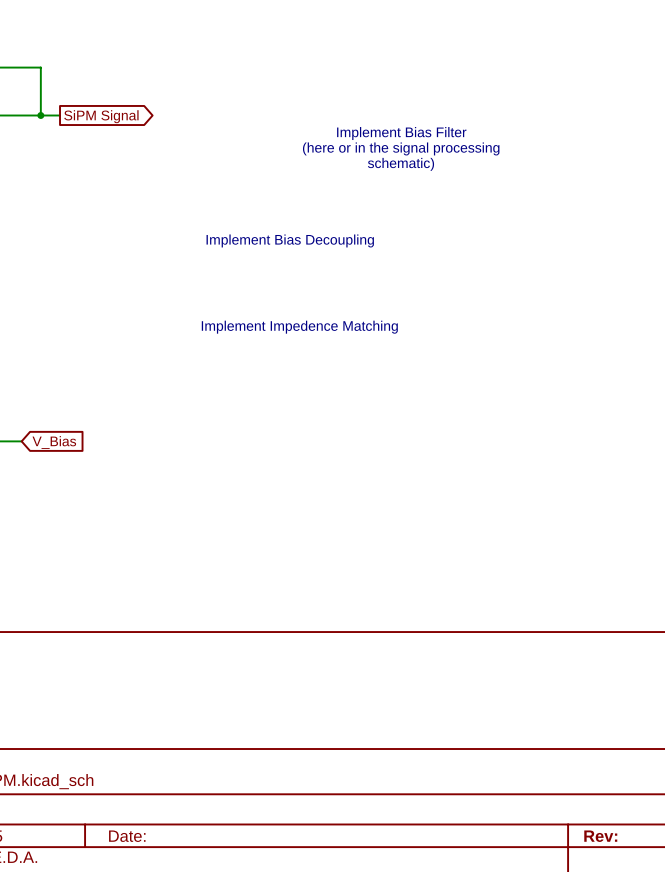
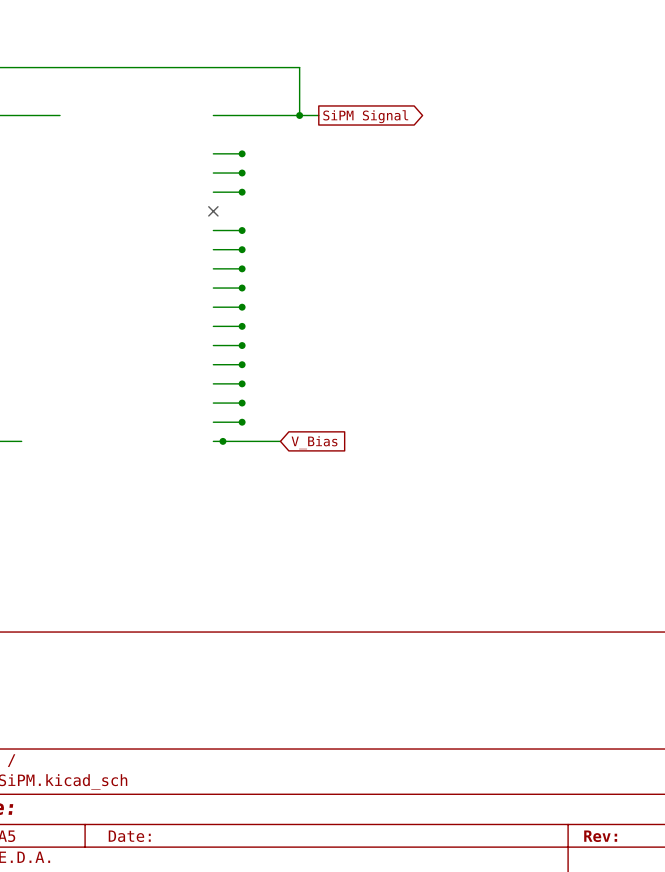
wire: (40, 67) (40, 115) -> (40, 67) (299, 67) (299, 115)
junction: (40, 115) -> none
wire: none -> (213, 115) (318, 115)
junction: none -> (299, 115)
global label: SiPM Signal (101, 116) -> none
global label: none -> SiPM Signal (365, 116)
text: Implement Bias Filter (401, 133) -> none
text: (here or in the signal processing (401, 148) -> none
wire: none -> (213, 153) (242, 153)
junction: none -> (242, 153)
text: schematic) (400, 164) -> none
wire: none -> (213, 173) (242, 173)
junction: none -> (242, 173)
wire: none -> (213, 192) (242, 192)
junction: none -> (242, 192)
no-connect mark: none -> (213, 211)
wire: none -> (213, 230) (242, 230)
junction: none -> (242, 230)
text: Implement Bias Decoupling (290, 240) -> none
wire: none -> (213, 249) (242, 249)
junction: none -> (242, 249)
wire: none -> (213, 268) (242, 268)
junction: none -> (242, 268)
wire: none -> (213, 288) (242, 288)
junction: none -> (242, 288)
wire: none -> (213, 307) (242, 307)
junction: none -> (242, 307)
wire: none -> (213, 326) (242, 326)
junction: none -> (242, 326)
text: Implement Impedence Matching (299, 327) -> none
wire: none -> (213, 345) (242, 345)
junction: none -> (242, 345)
wire: none -> (213, 364) (242, 364)
junction: none -> (242, 364)
wire: none -> (213, 383) (242, 383)
junction: none -> (242, 383)
wire: none -> (213, 403) (242, 403)
junction: none -> (242, 403)
wire: none -> (213, 422) (242, 422)
junction: none -> (242, 422)
wire: none -> (213, 441) (280, 441)
junction: none -> (222, 441)
global label: V_Bias (54, 442) -> none
global label: none -> V_Bias (314, 442)

